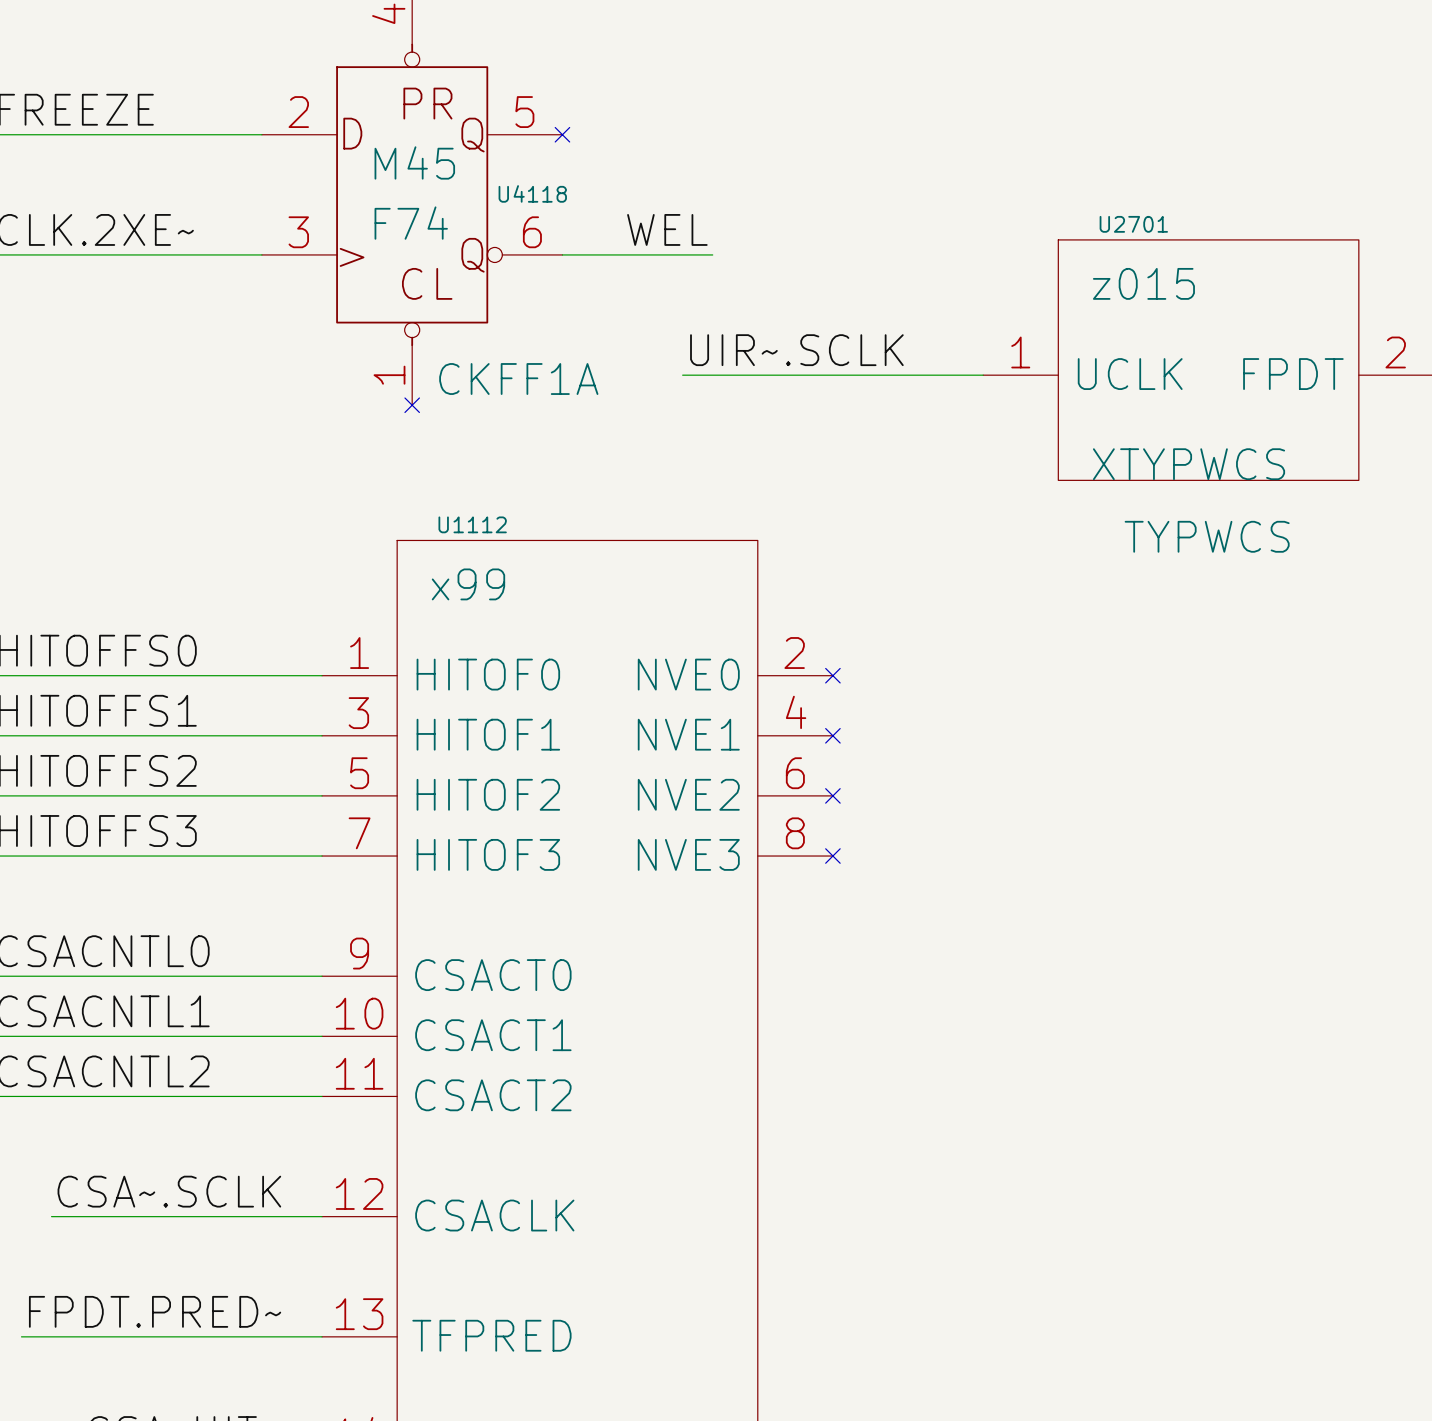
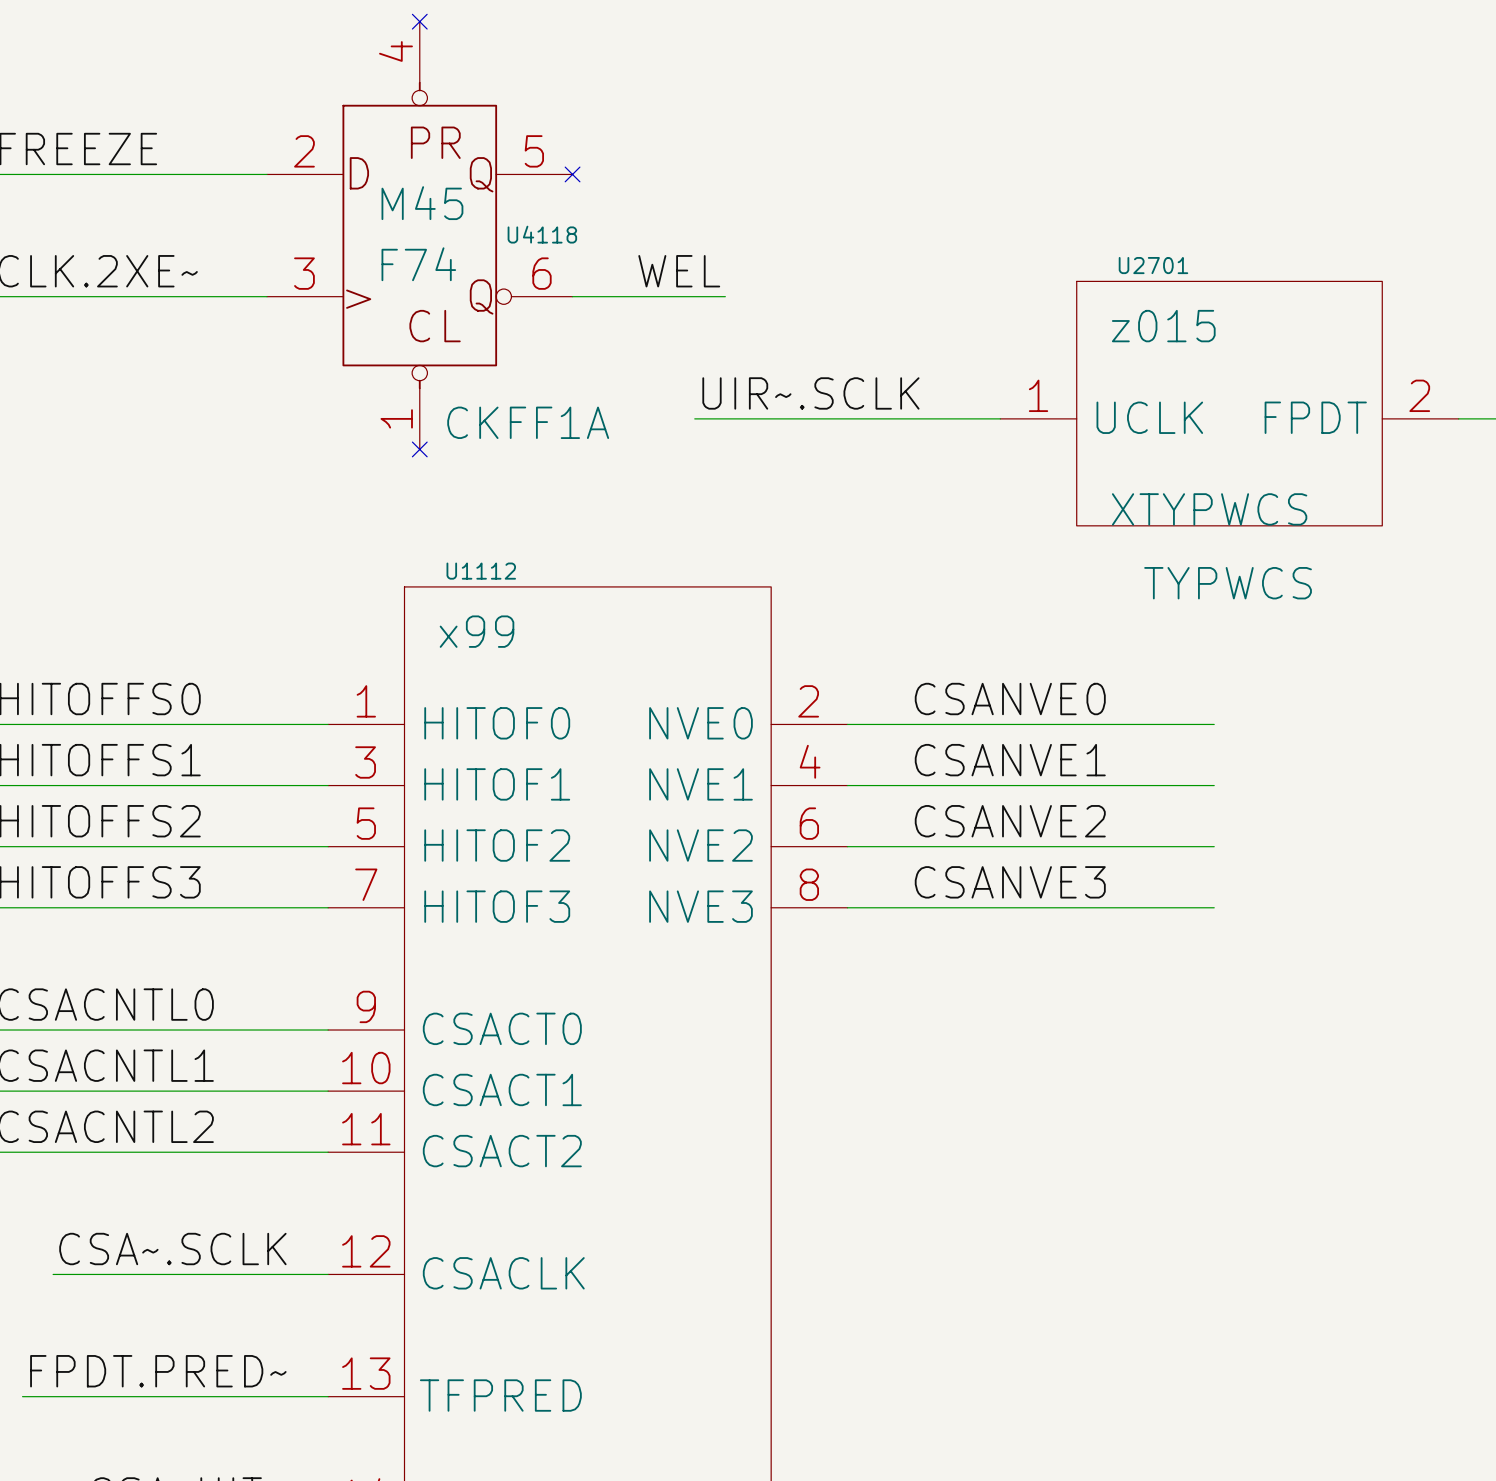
label: none -> CSANVE0 (1010, 699)
wire: none -> (847, 724) (1214, 724)
no-connect mark: (832, 675) -> none
label: none -> CSANVE1 (1010, 760)
wire: none -> (847, 785) (1214, 785)
no-connect mark: (832, 735) -> none
label: none -> CSANVE2 (1010, 821)
wire: none -> (847, 846) (1214, 846)
no-connect mark: (832, 795) -> none
label: none -> CSANVE3 (1010, 882)
wire: none -> (847, 907) (1214, 907)
no-connect mark: (832, 856) -> none

